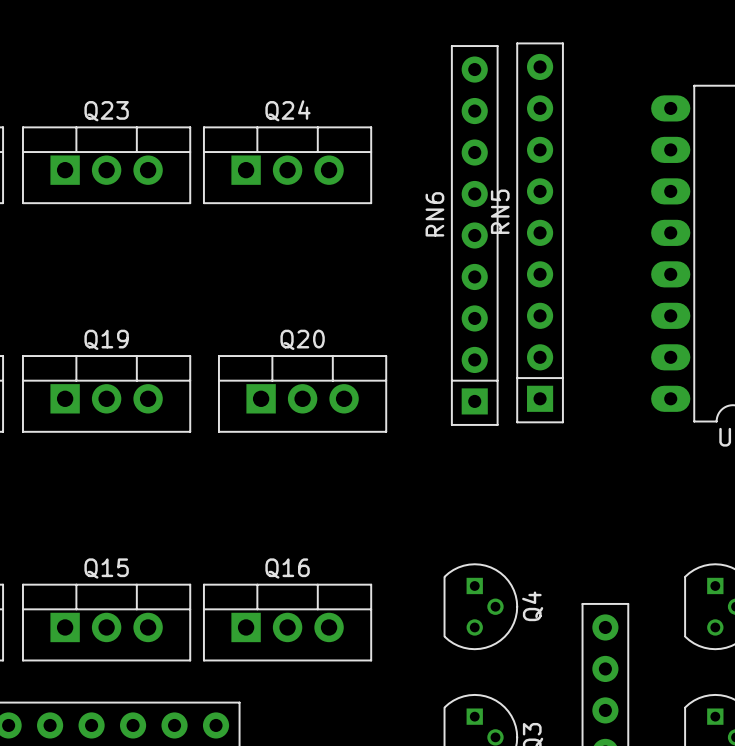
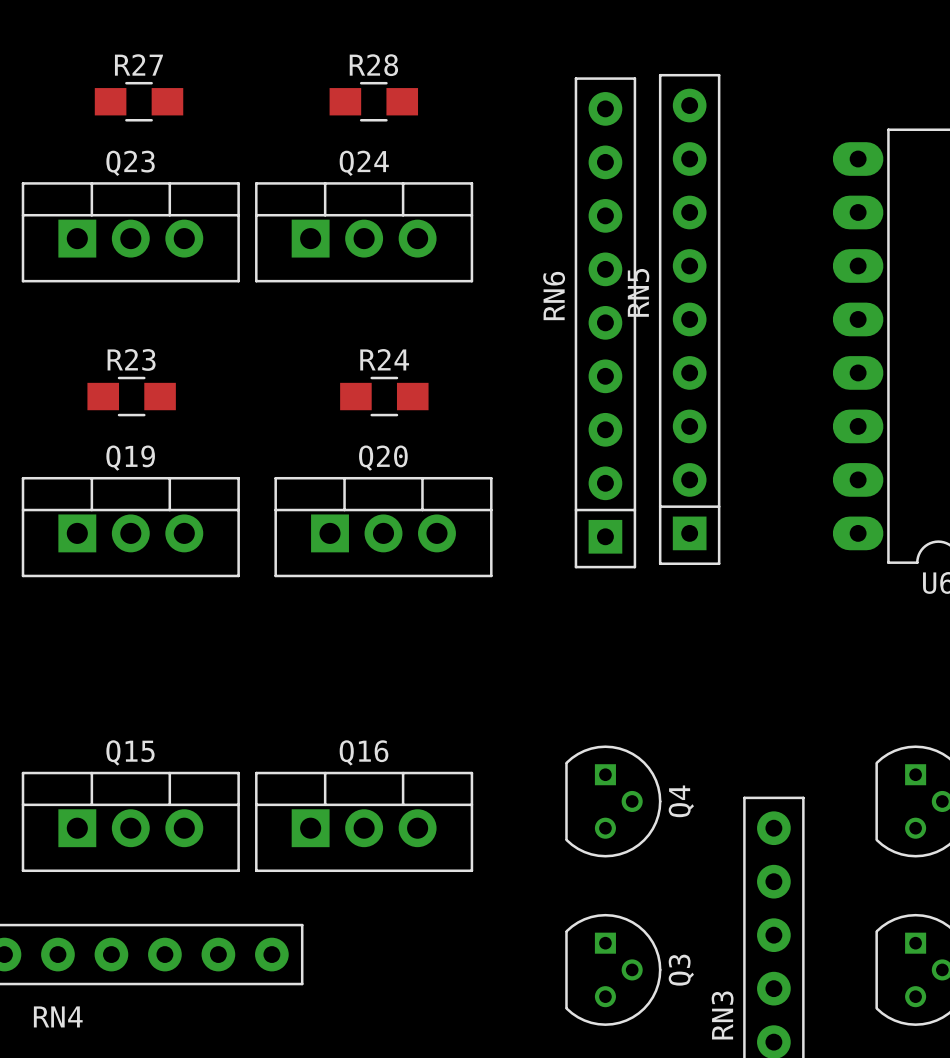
R27: none -> (139, 101)
R28: none -> (373, 101)
R23: none -> (131, 396)
R24: none -> (384, 396)

